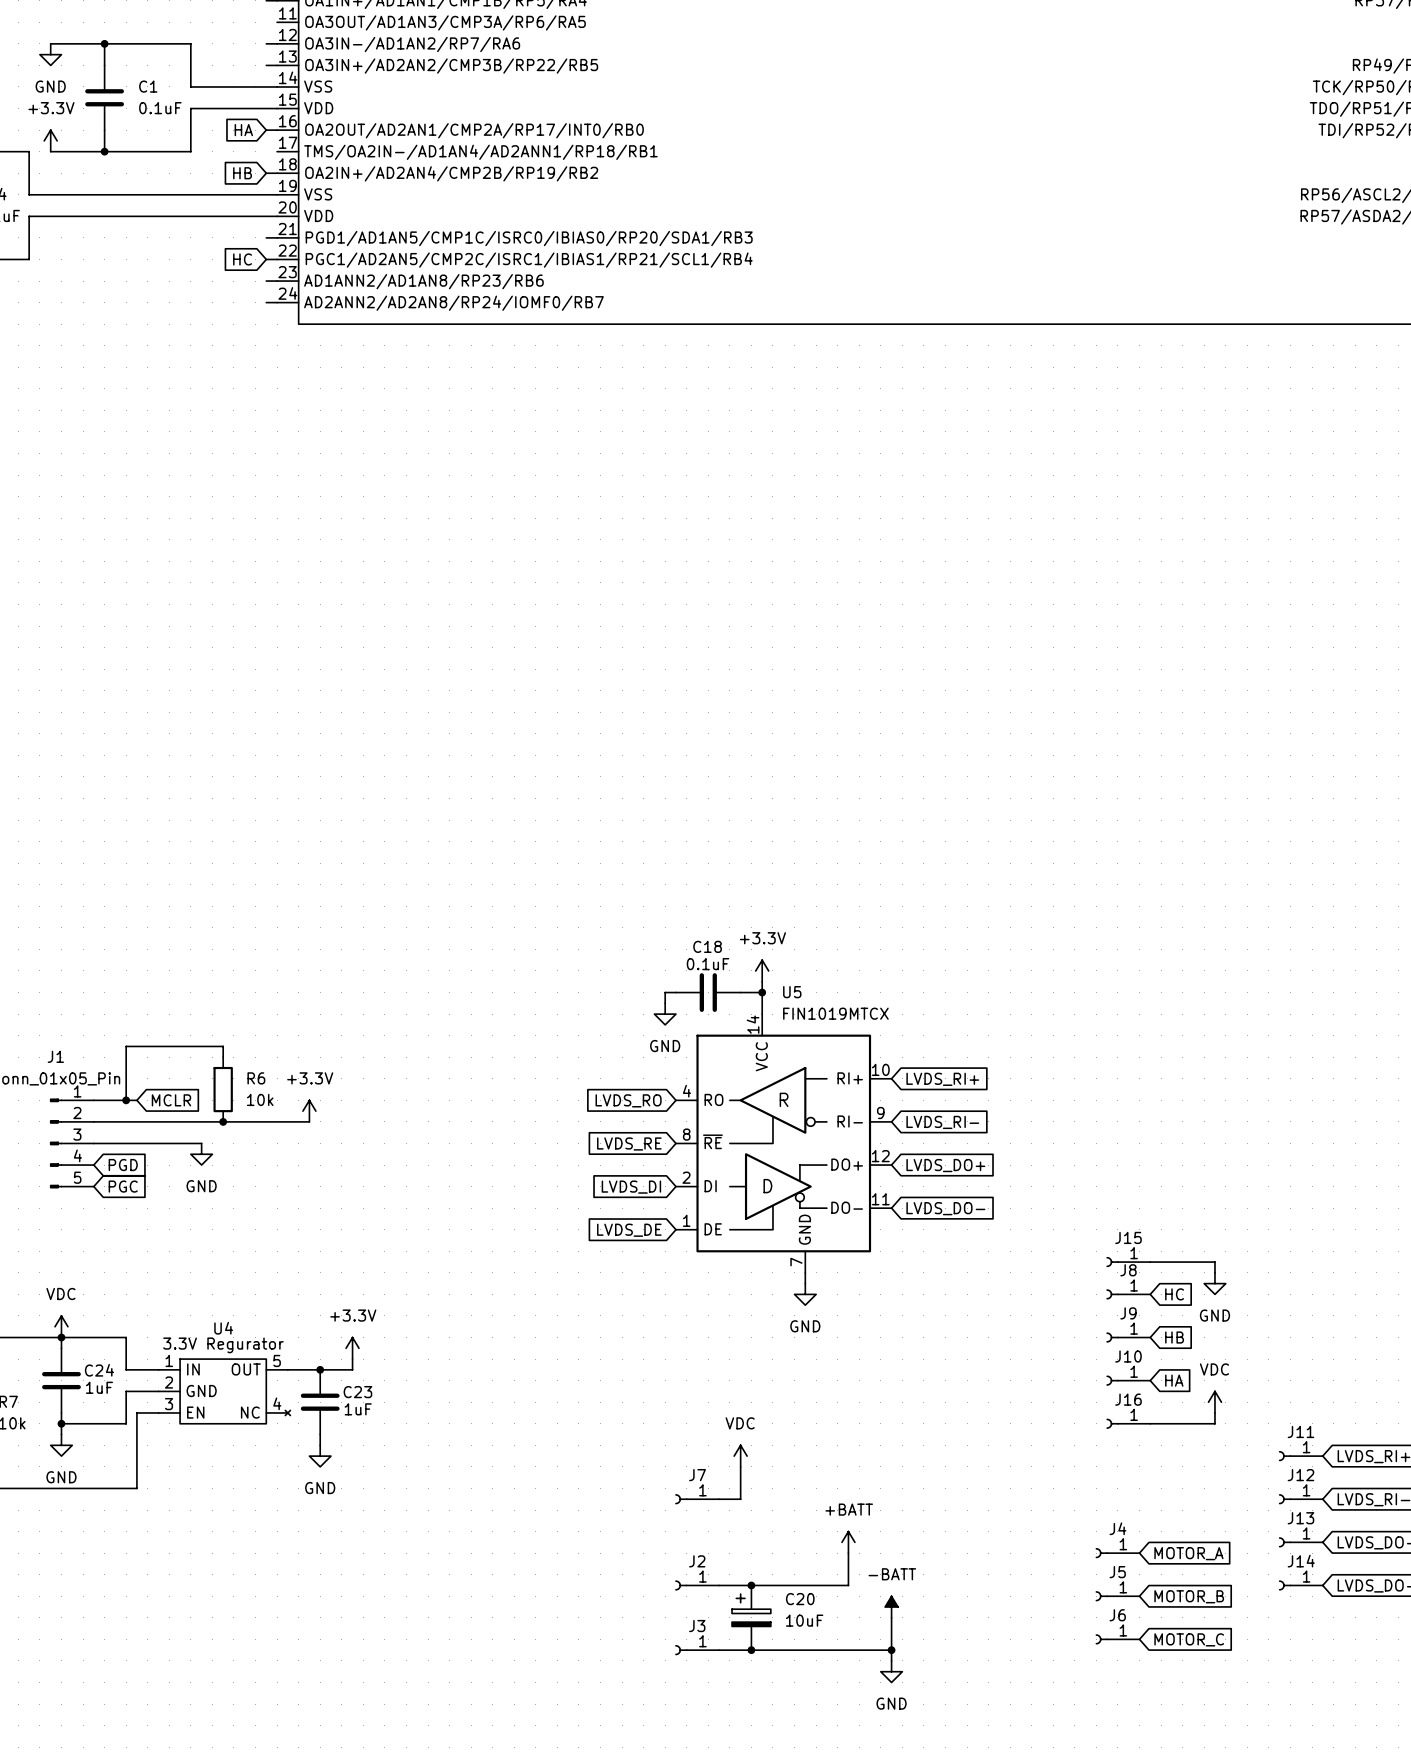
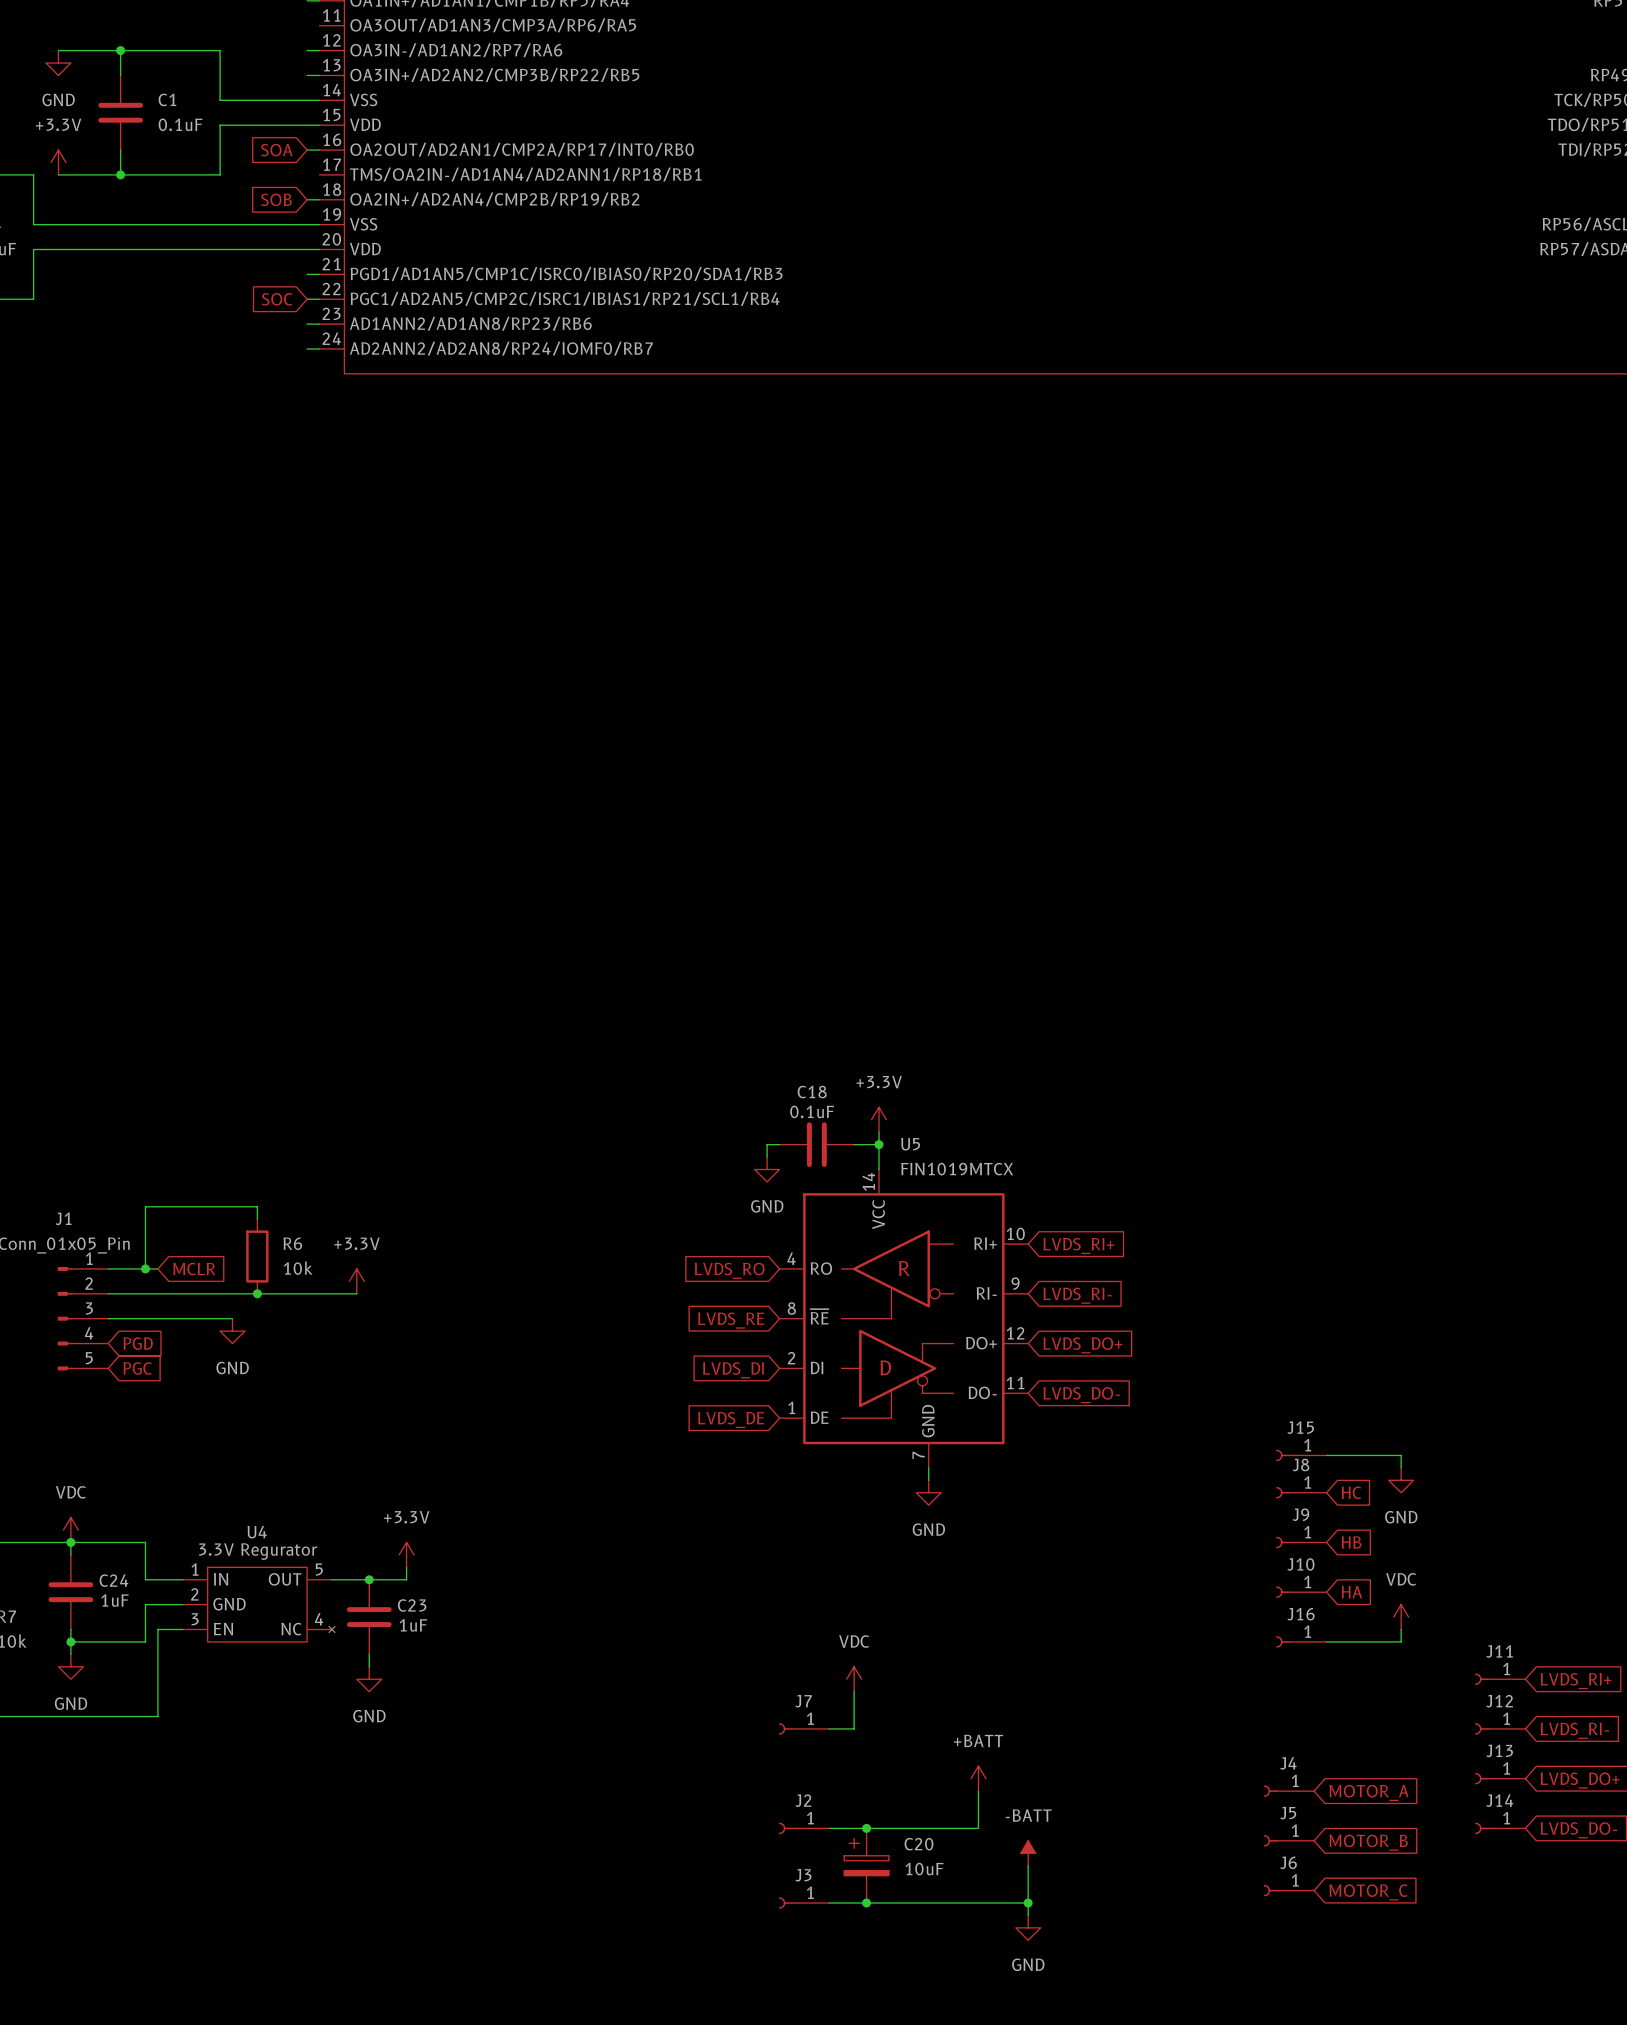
global label: HA (243, 130) -> SOA (276, 150)
global label: HB (242, 173) -> SOB (276, 199)
global label: HC (242, 259) -> SOC (277, 299)

